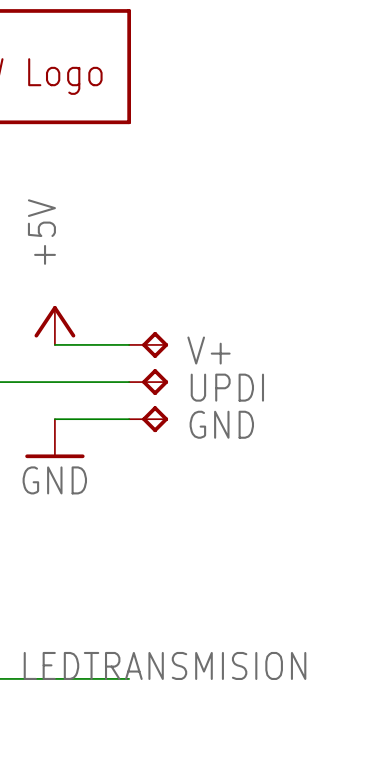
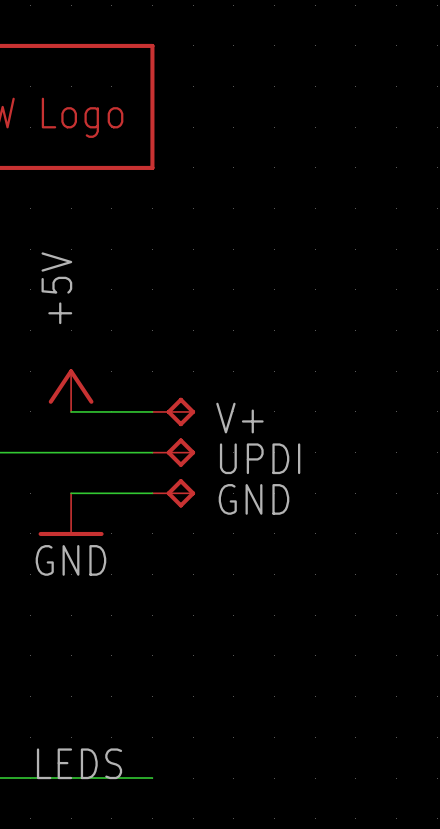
label: LEDTRANSMISION (165, 665) -> LEDS (79, 763)

